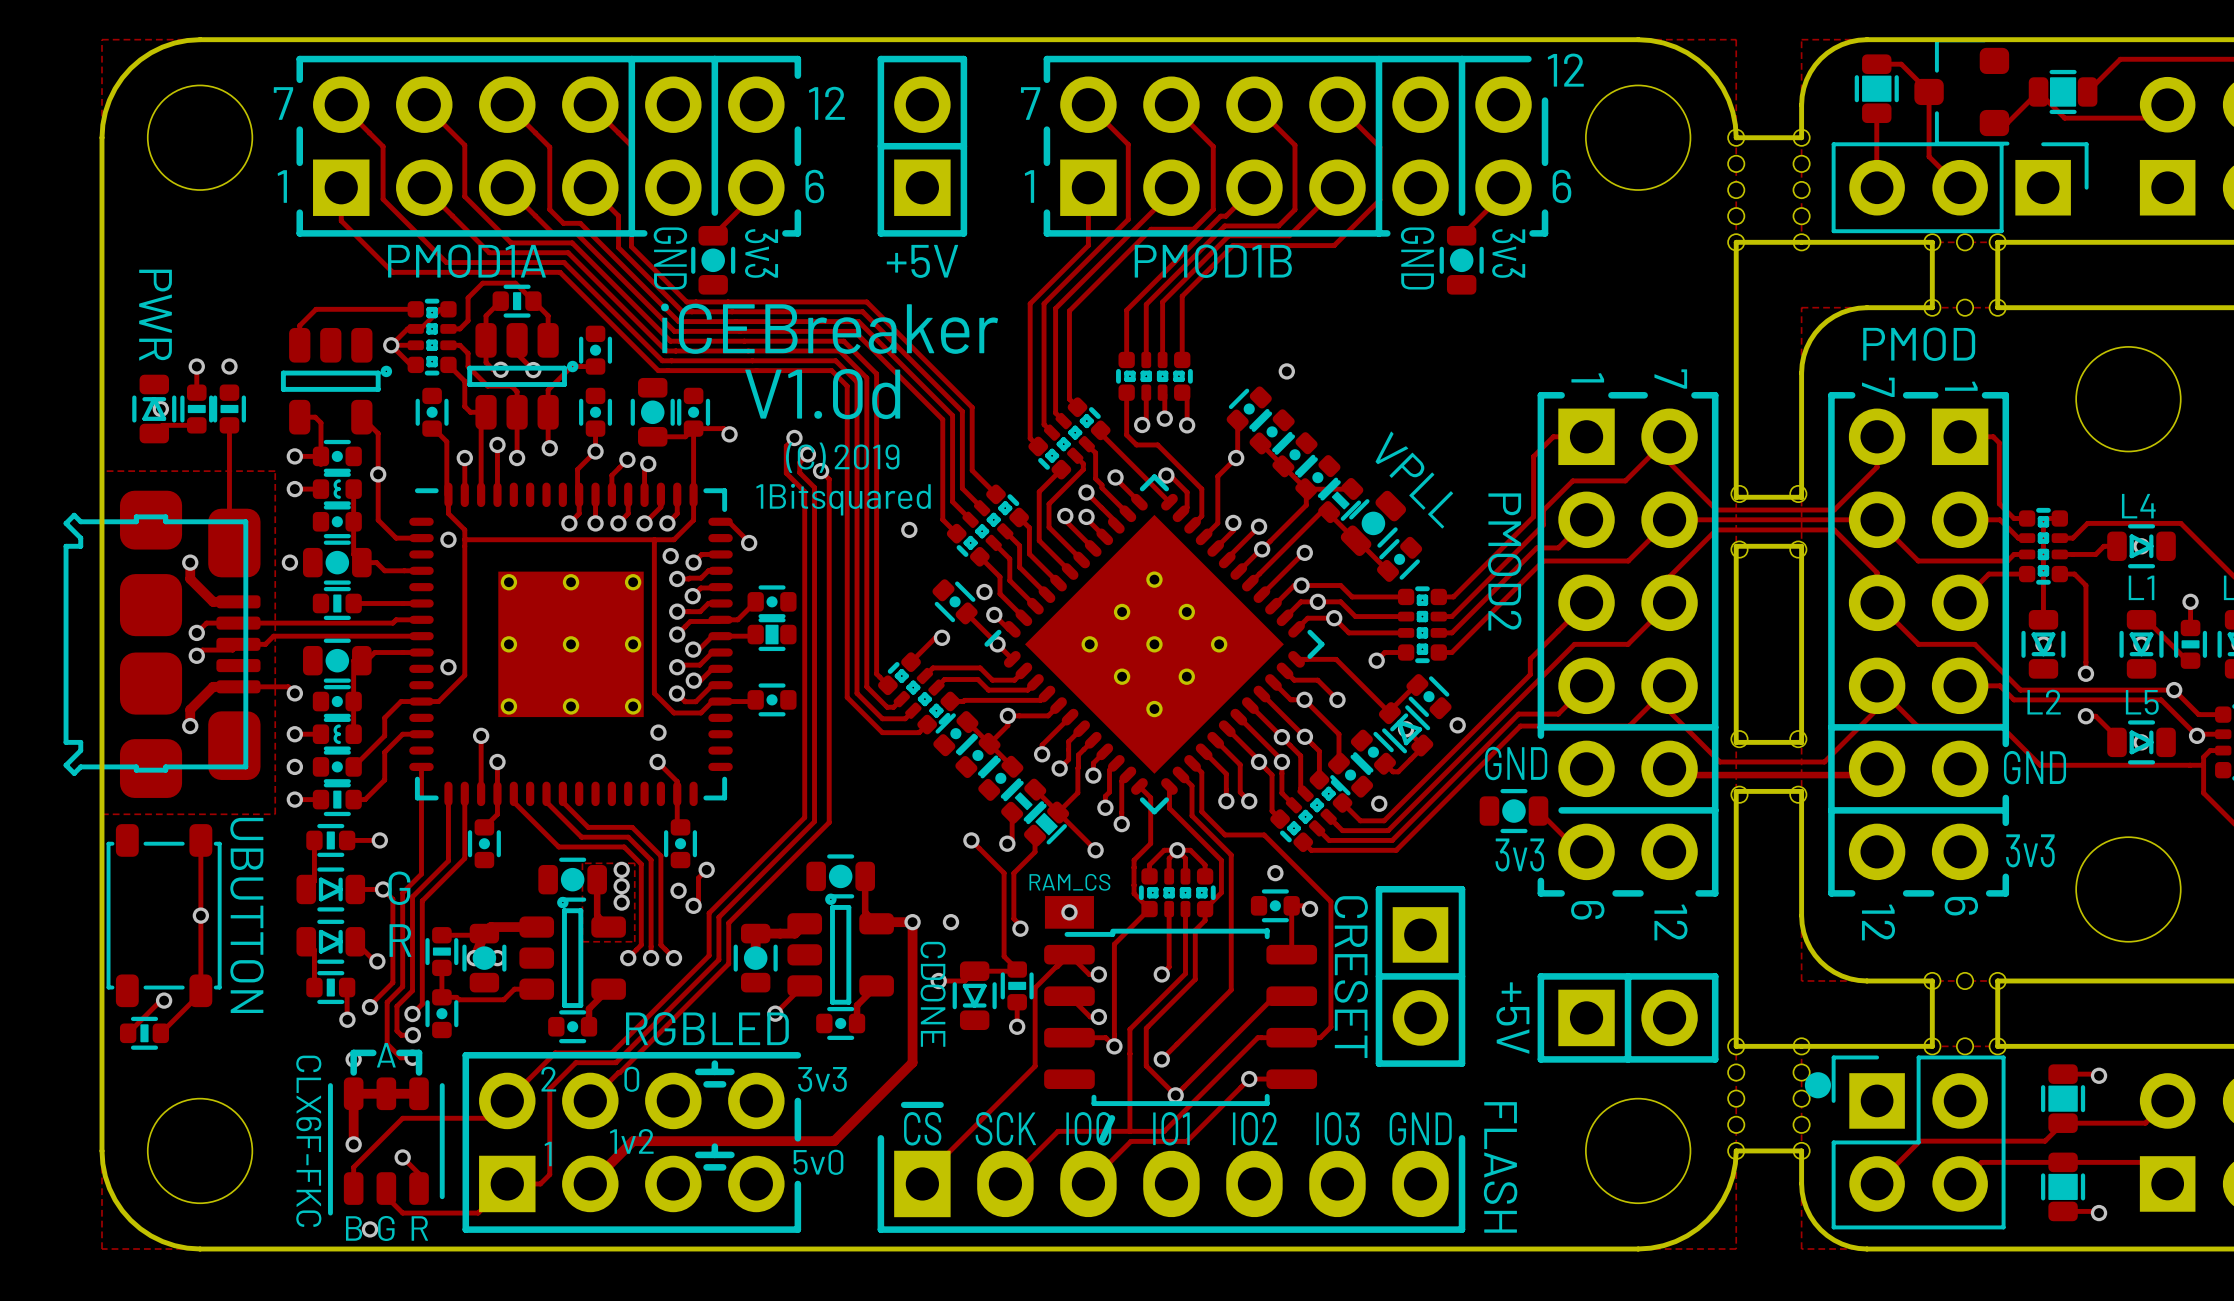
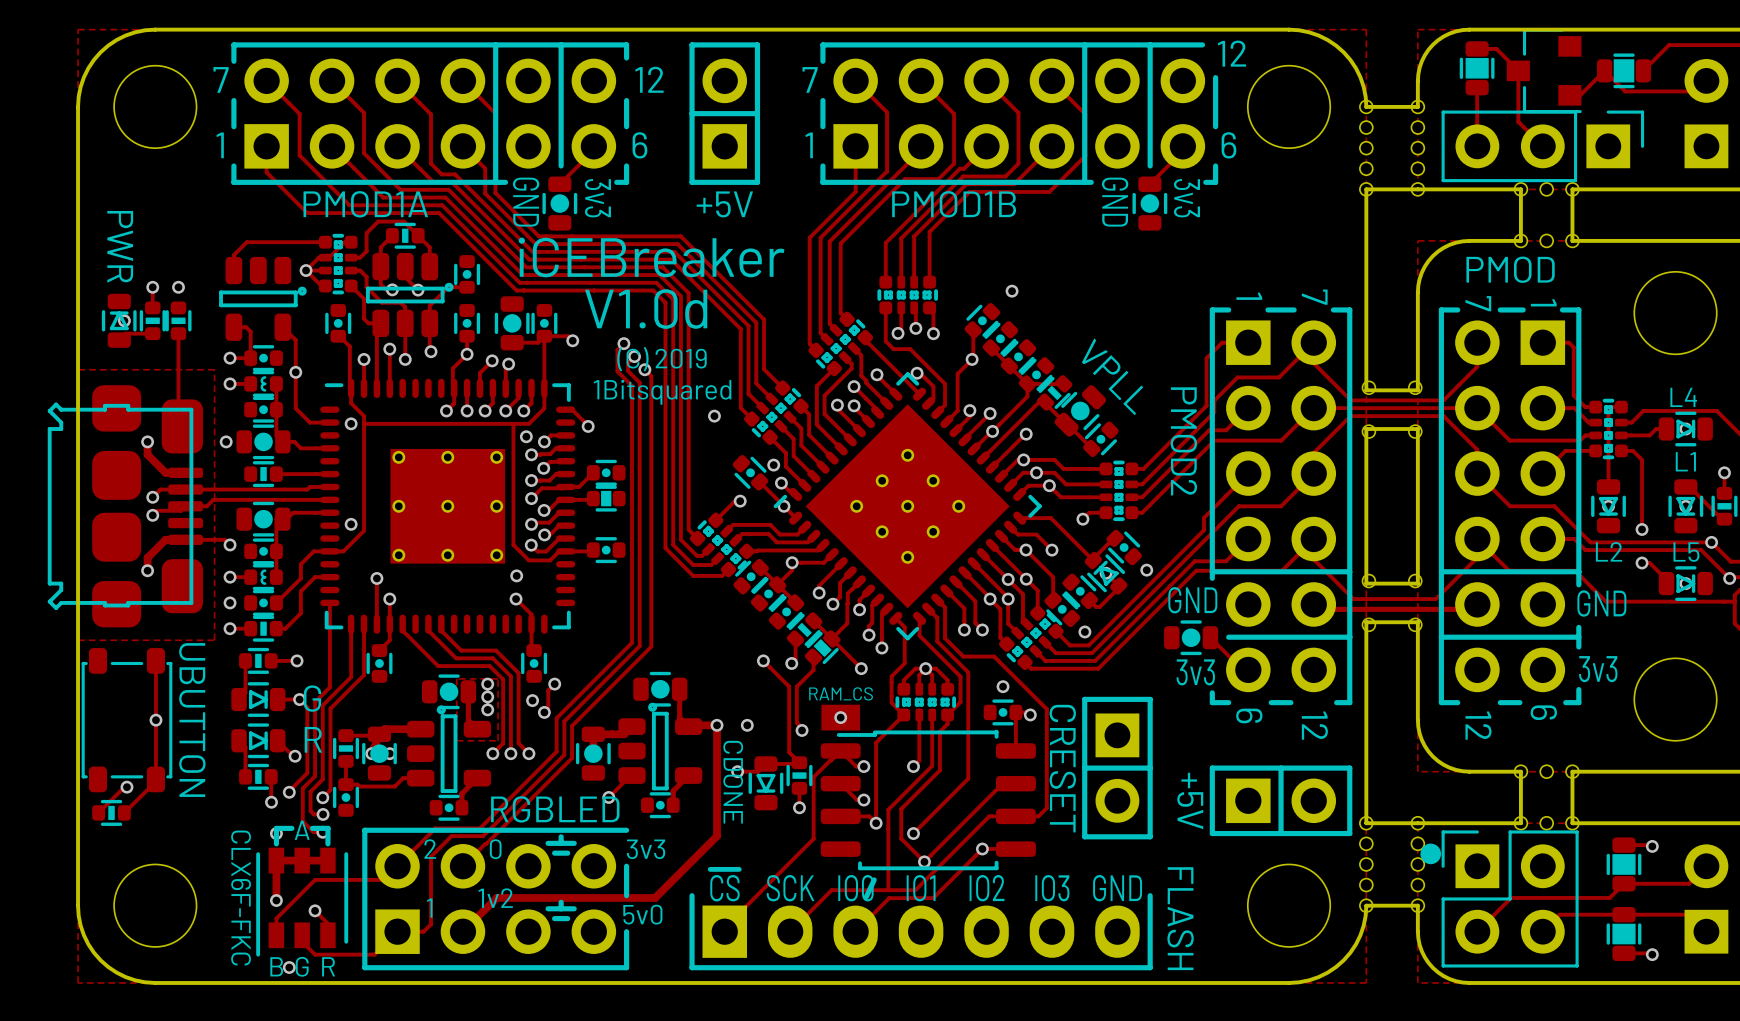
part footprint: [1914, 38, 2010, 146] -> [1506, 28, 1582, 114]
part footprint: [328, 1077, 445, 1216] -> [256, 847, 349, 957]

